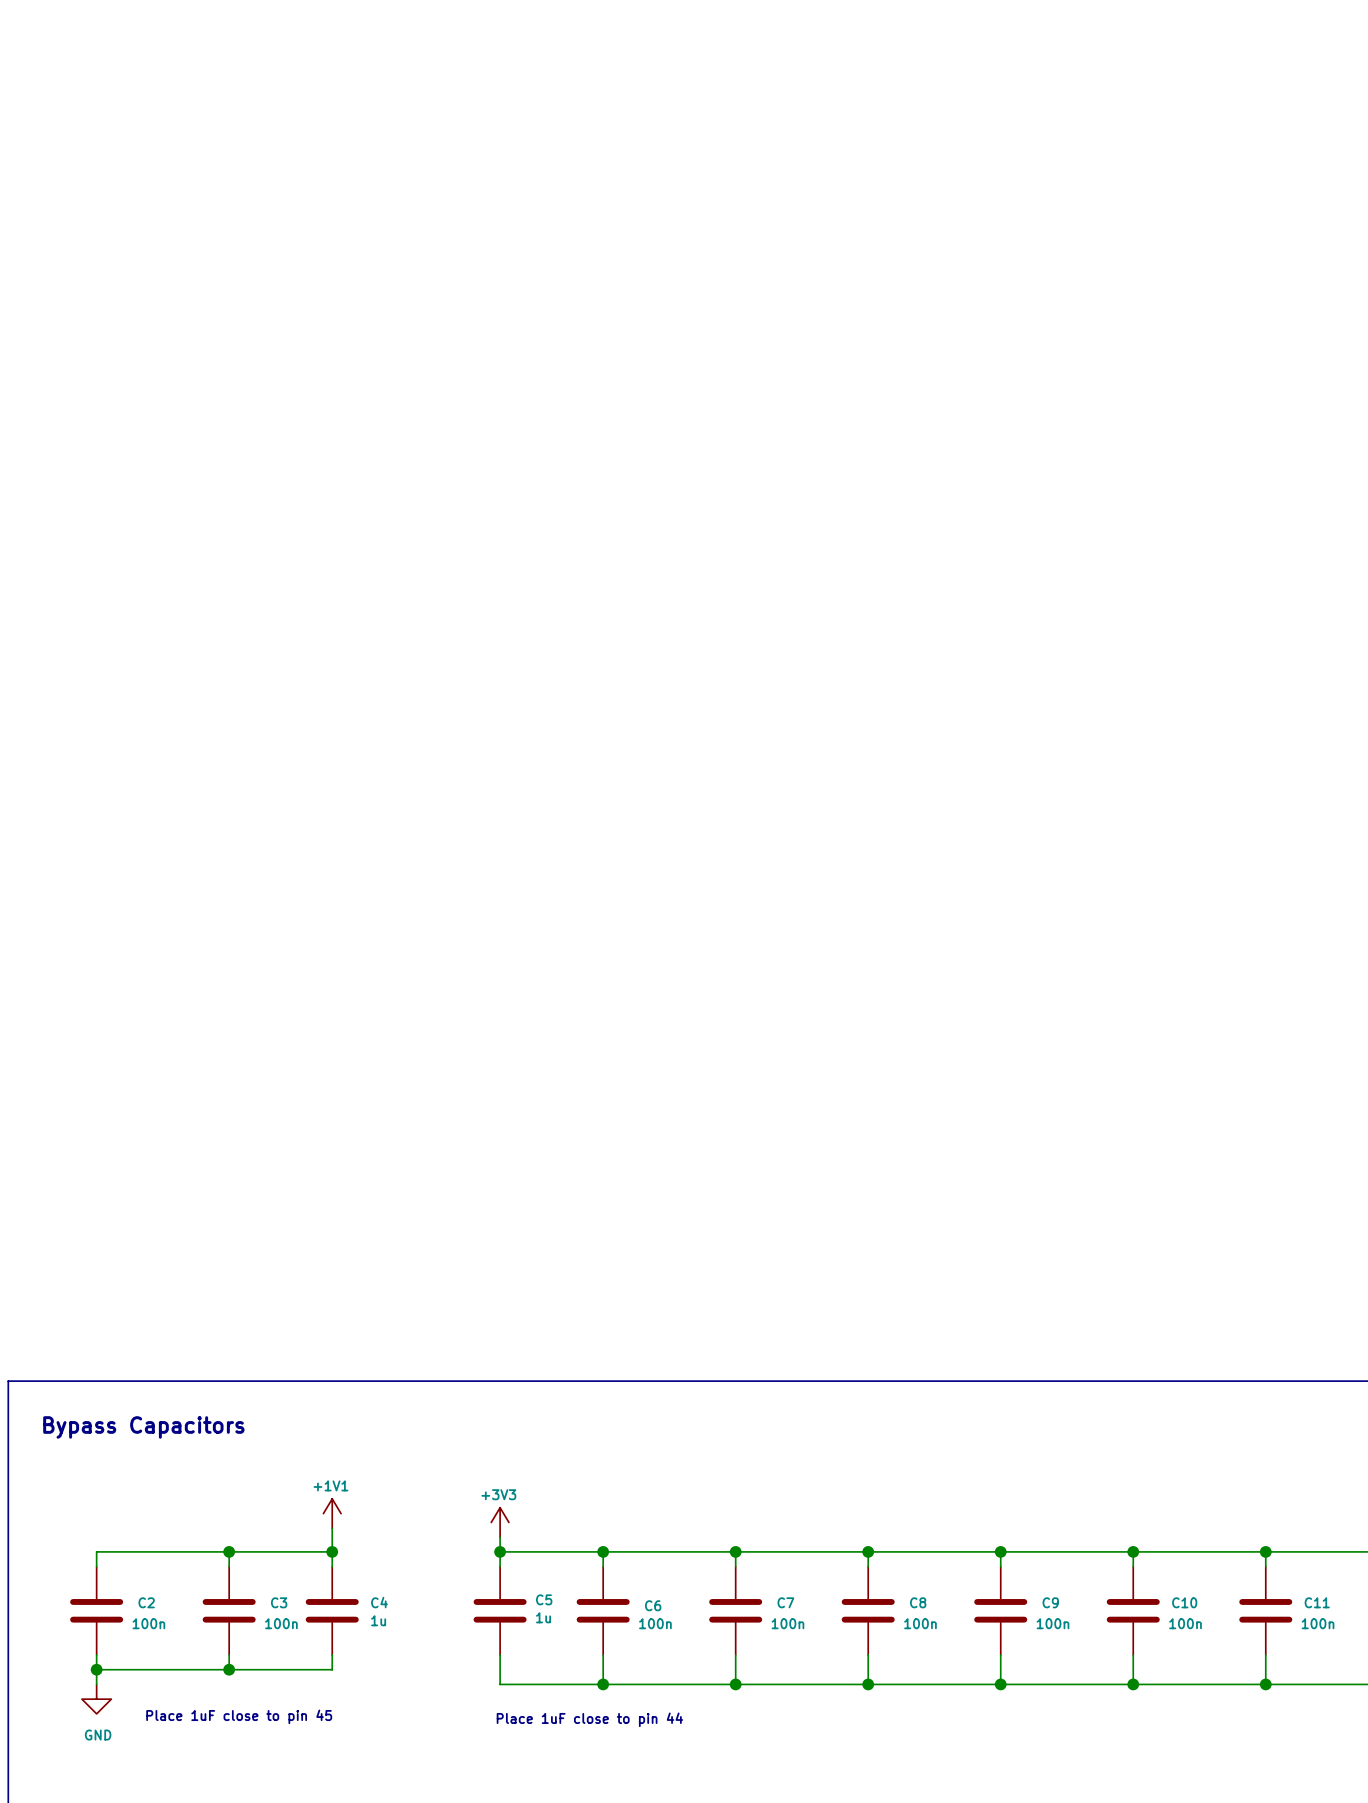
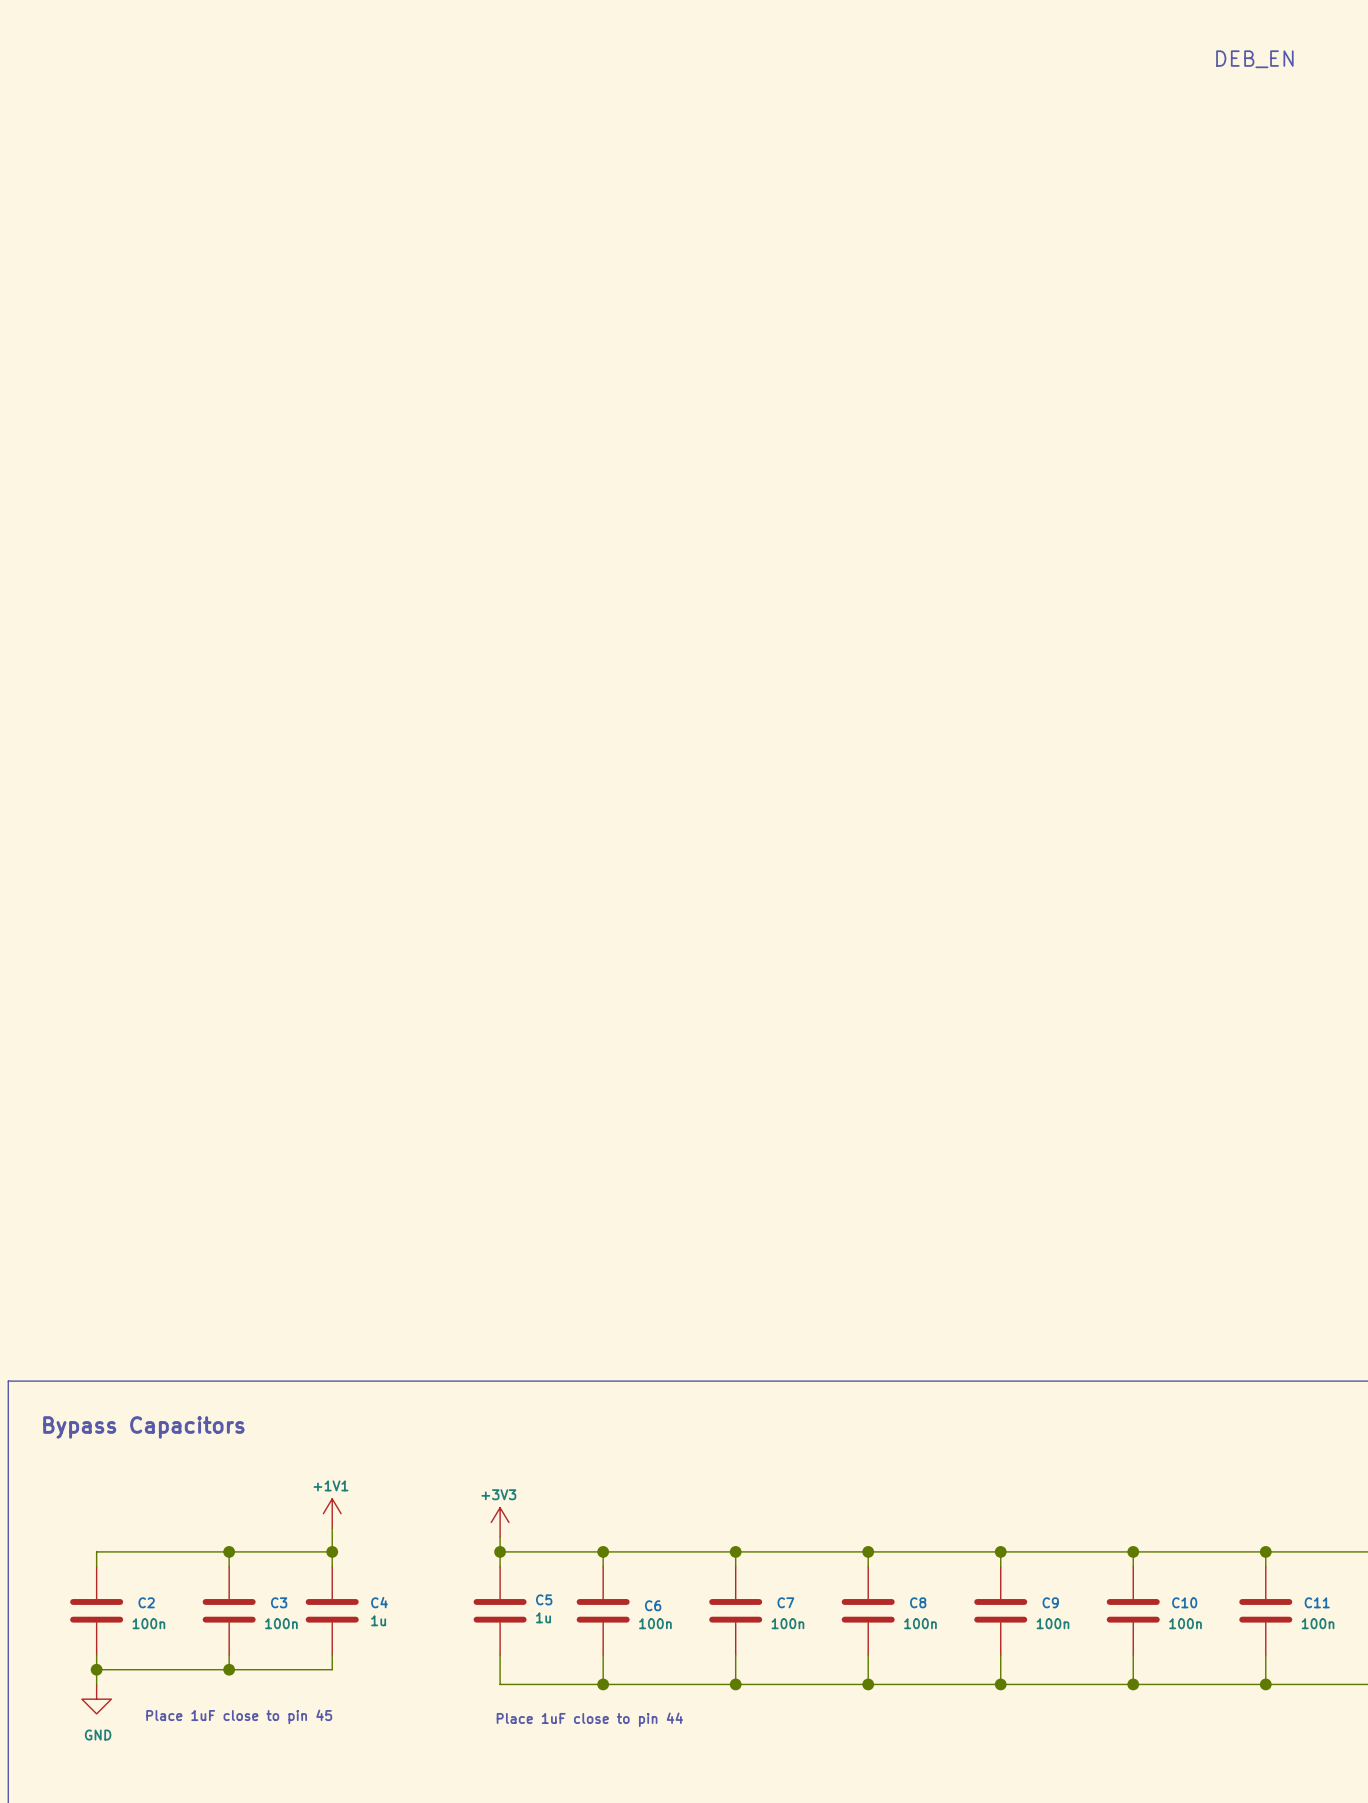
text: none -> DEB_EN (1254, 59)

